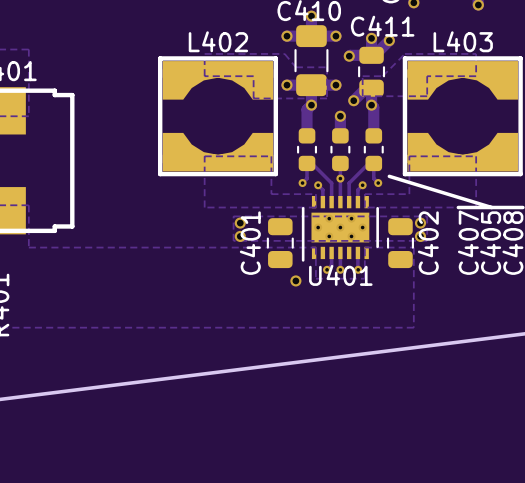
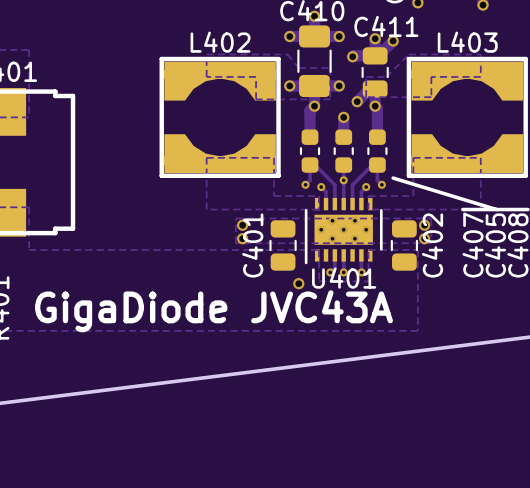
text: none -> GigaDiode JVC43A (213, 311)

